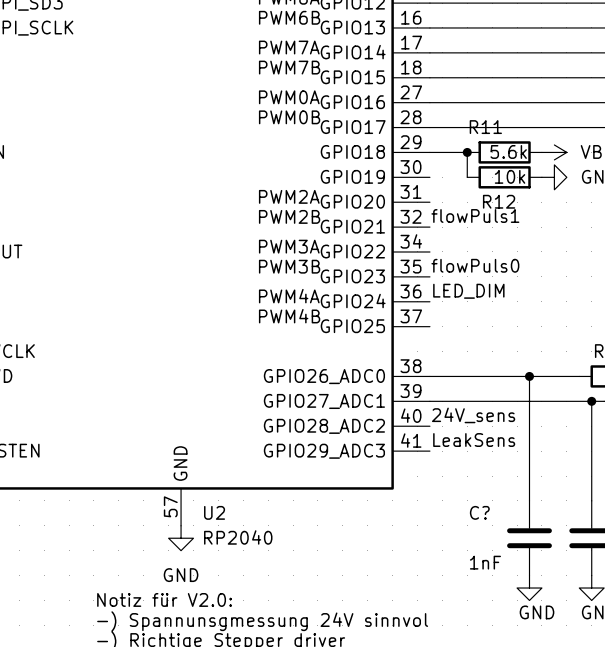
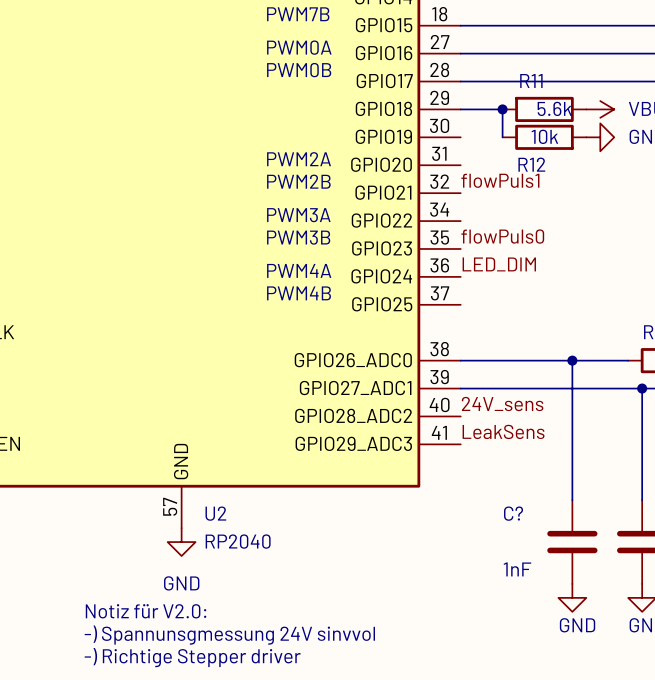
text: -) Spannunsgmessung 24V sinnvol (262, 621) -> -) Spannunsgmessung 24V sinvvol (229, 635)

